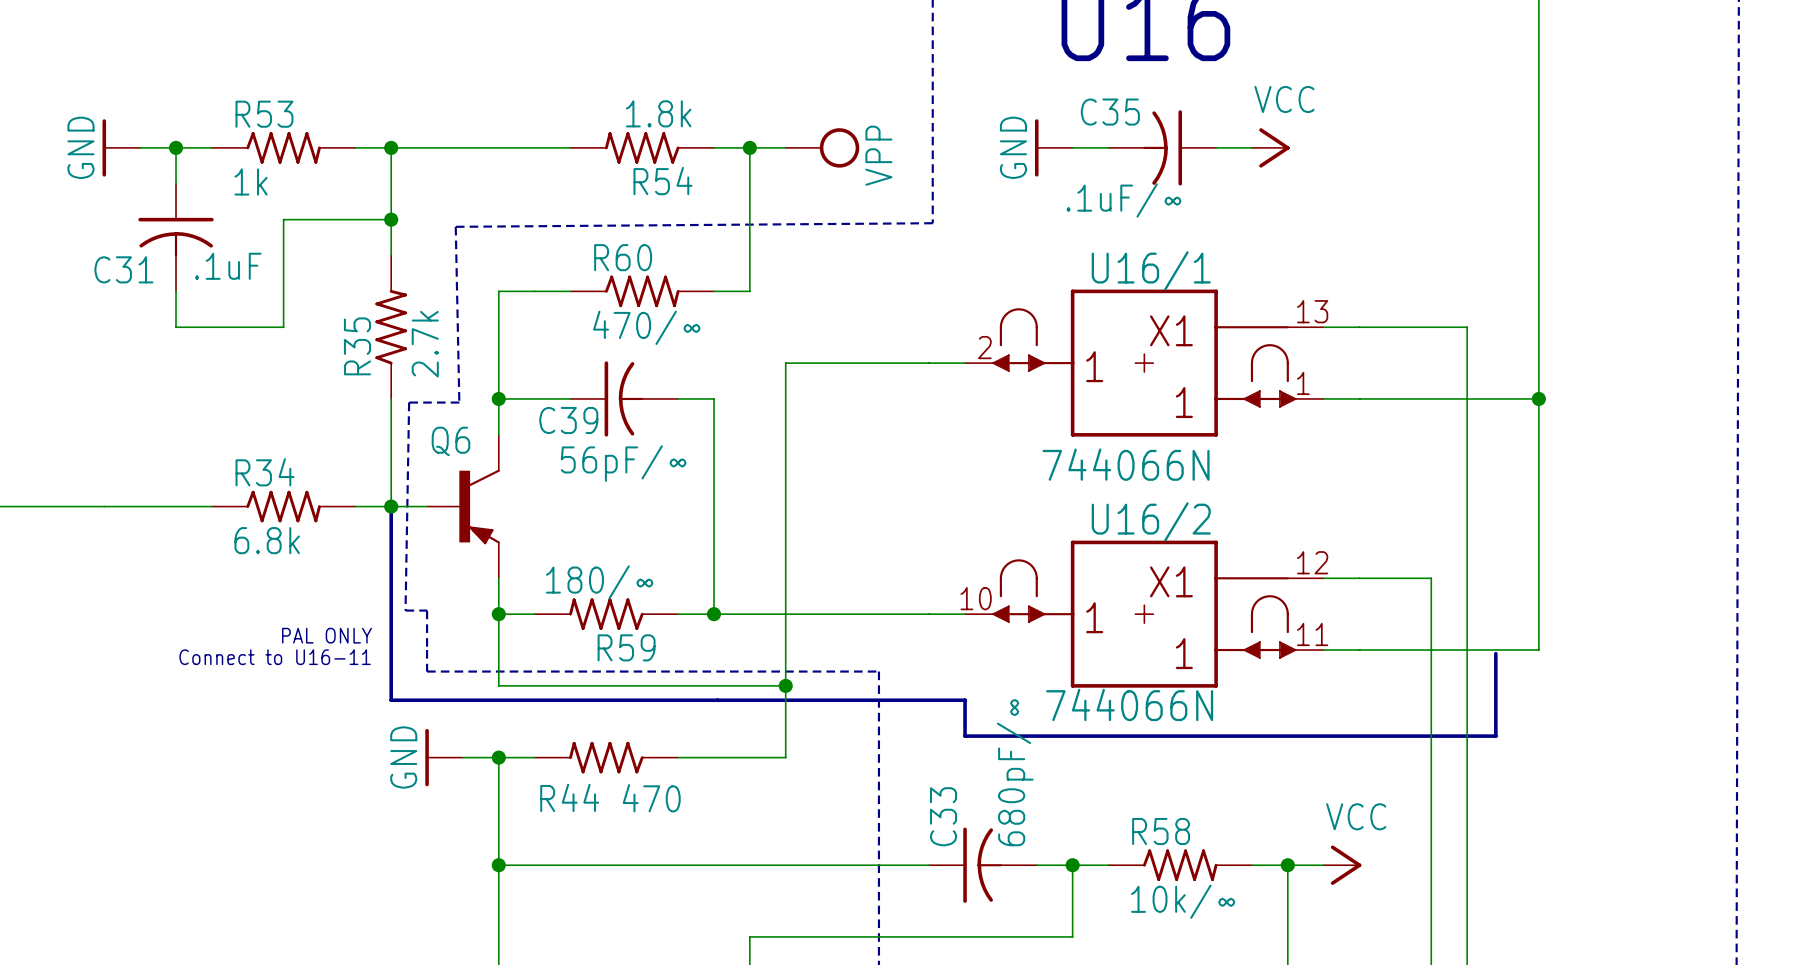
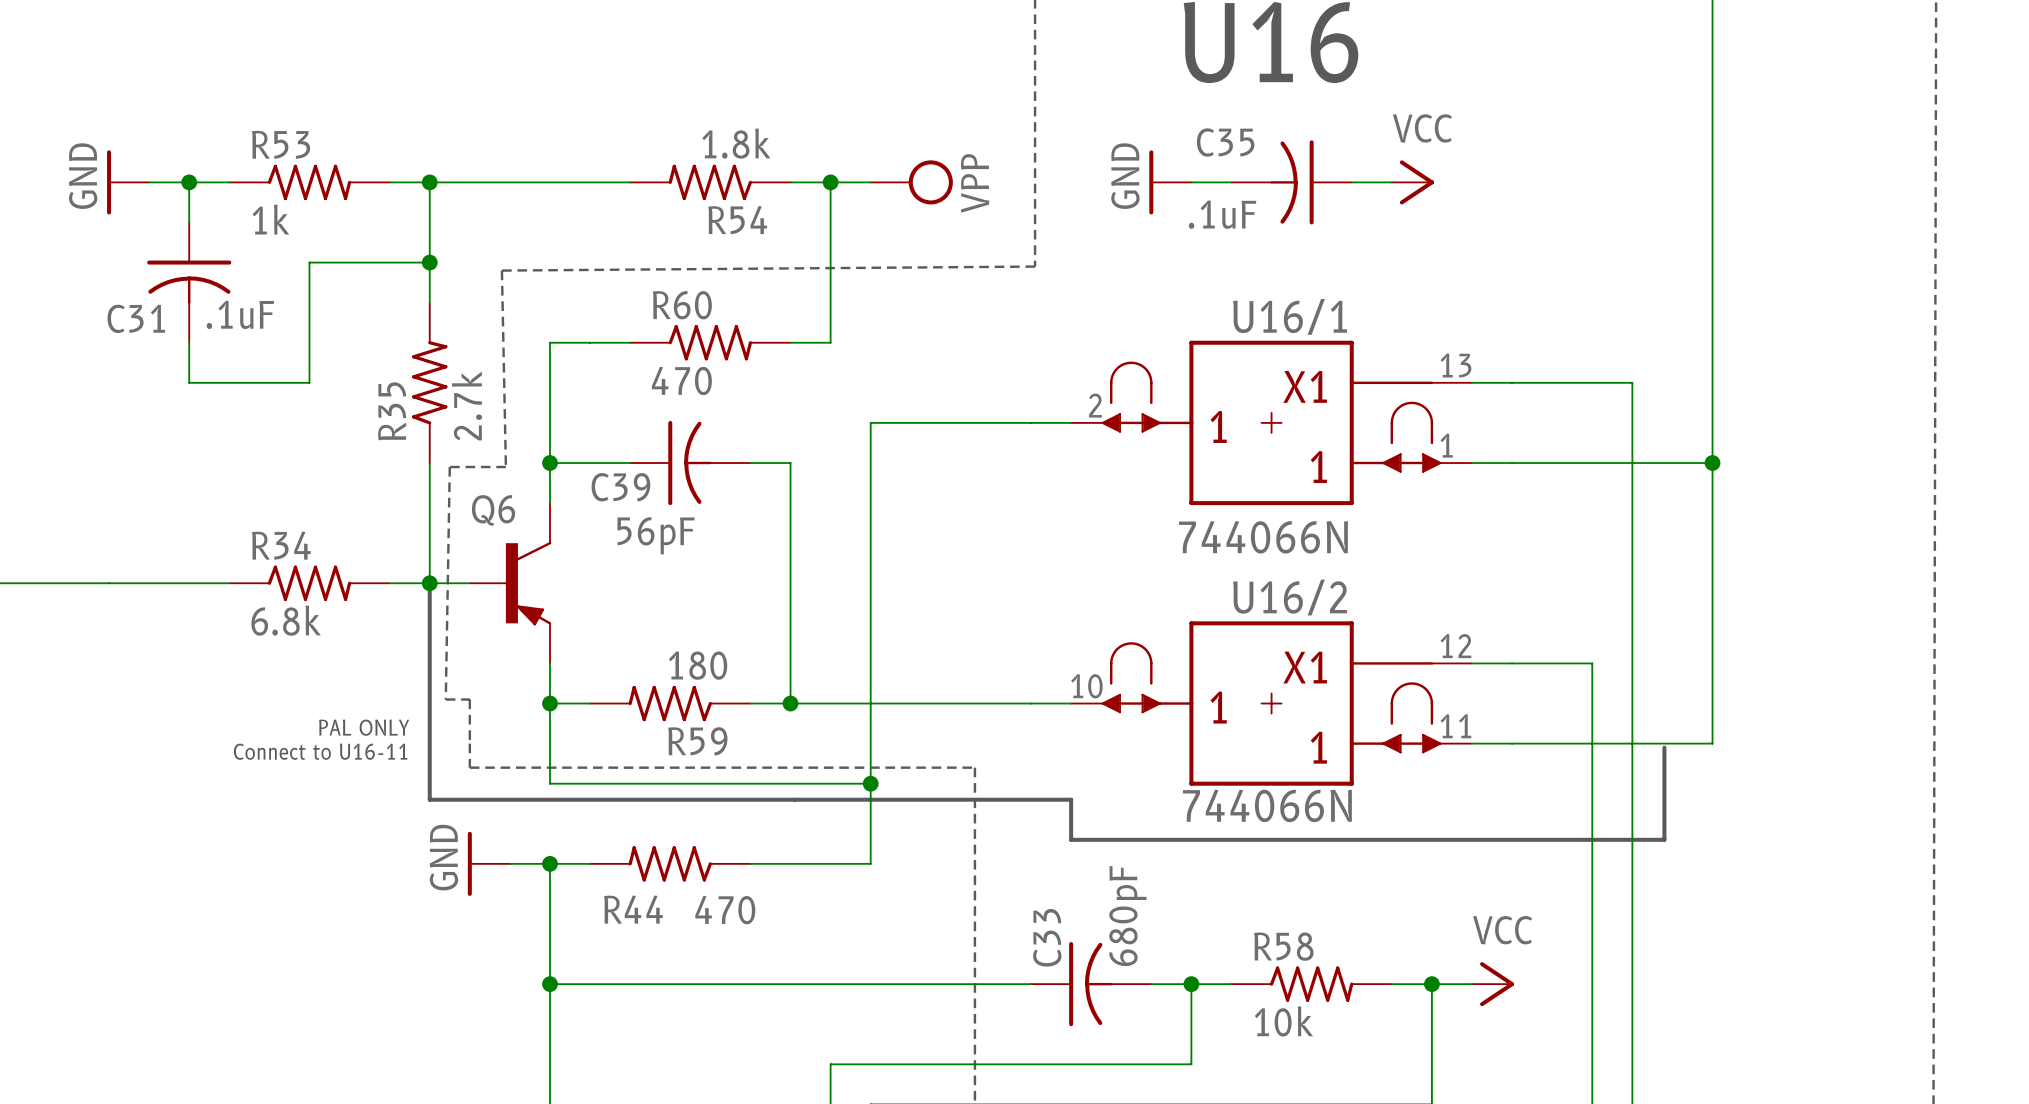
C35 value: .1uF/∞ (1123, 200) -> .1uF (1222, 214)
R60 value: 470/∞ (646, 327) -> 470 (681, 380)
C39 value: 56pF/∞ (623, 463) -> 56pF (656, 535)
R59 value: 180/∞ (599, 582) -> 180 (698, 665)
C33 value: 680pF/∞ (1015, 772) -> 680pF (1127, 916)
R58 value: 10k/∞ (1183, 901) -> 10k (1283, 1021)

